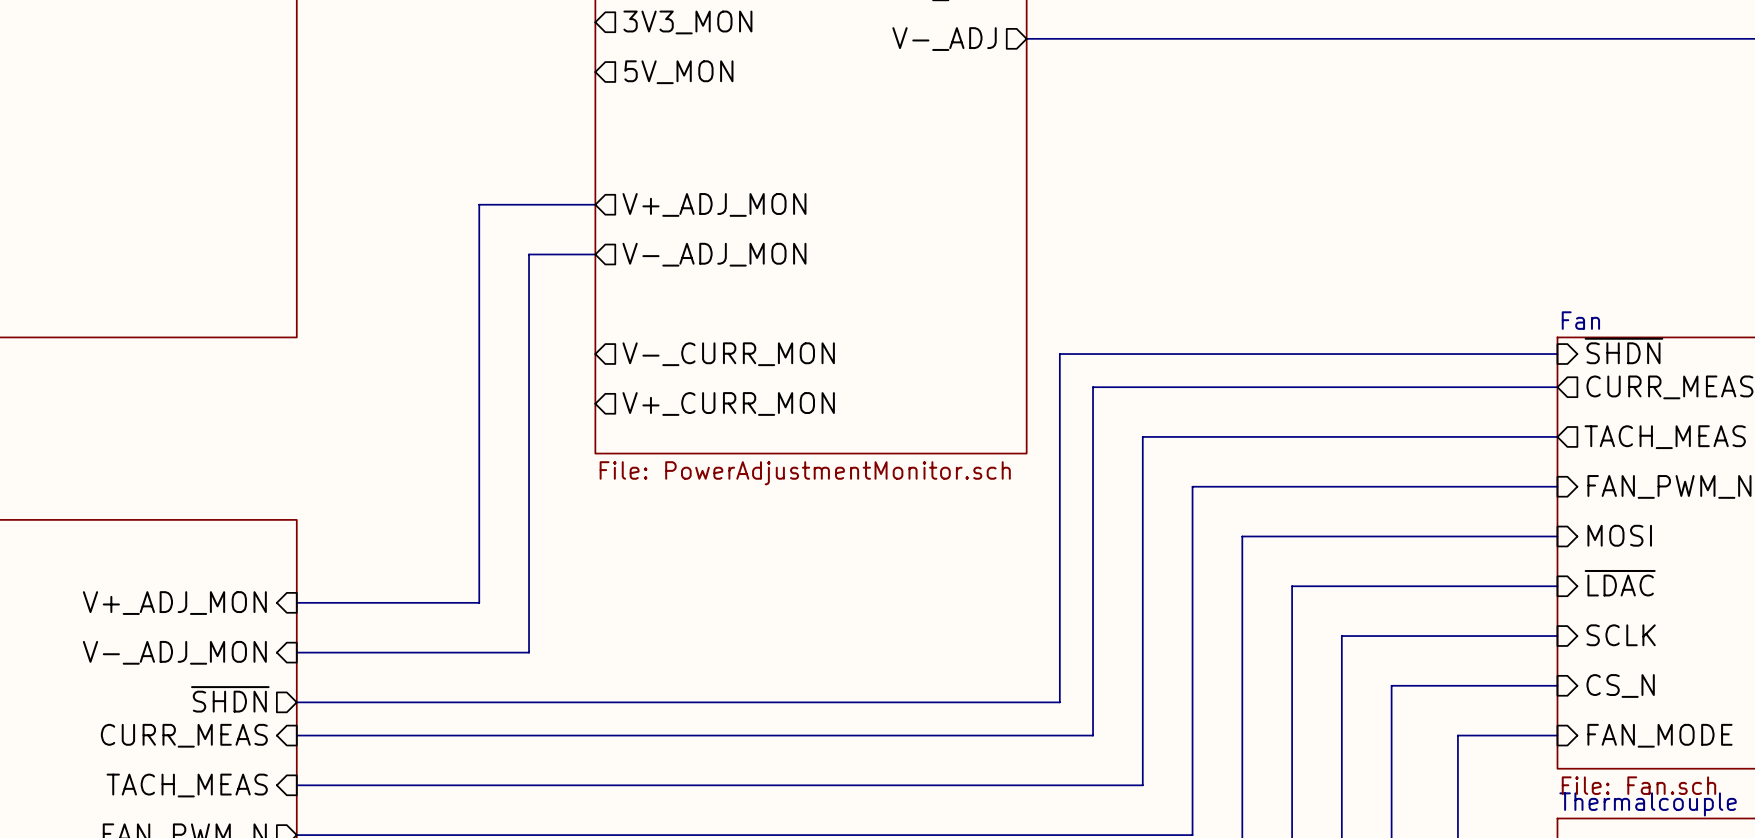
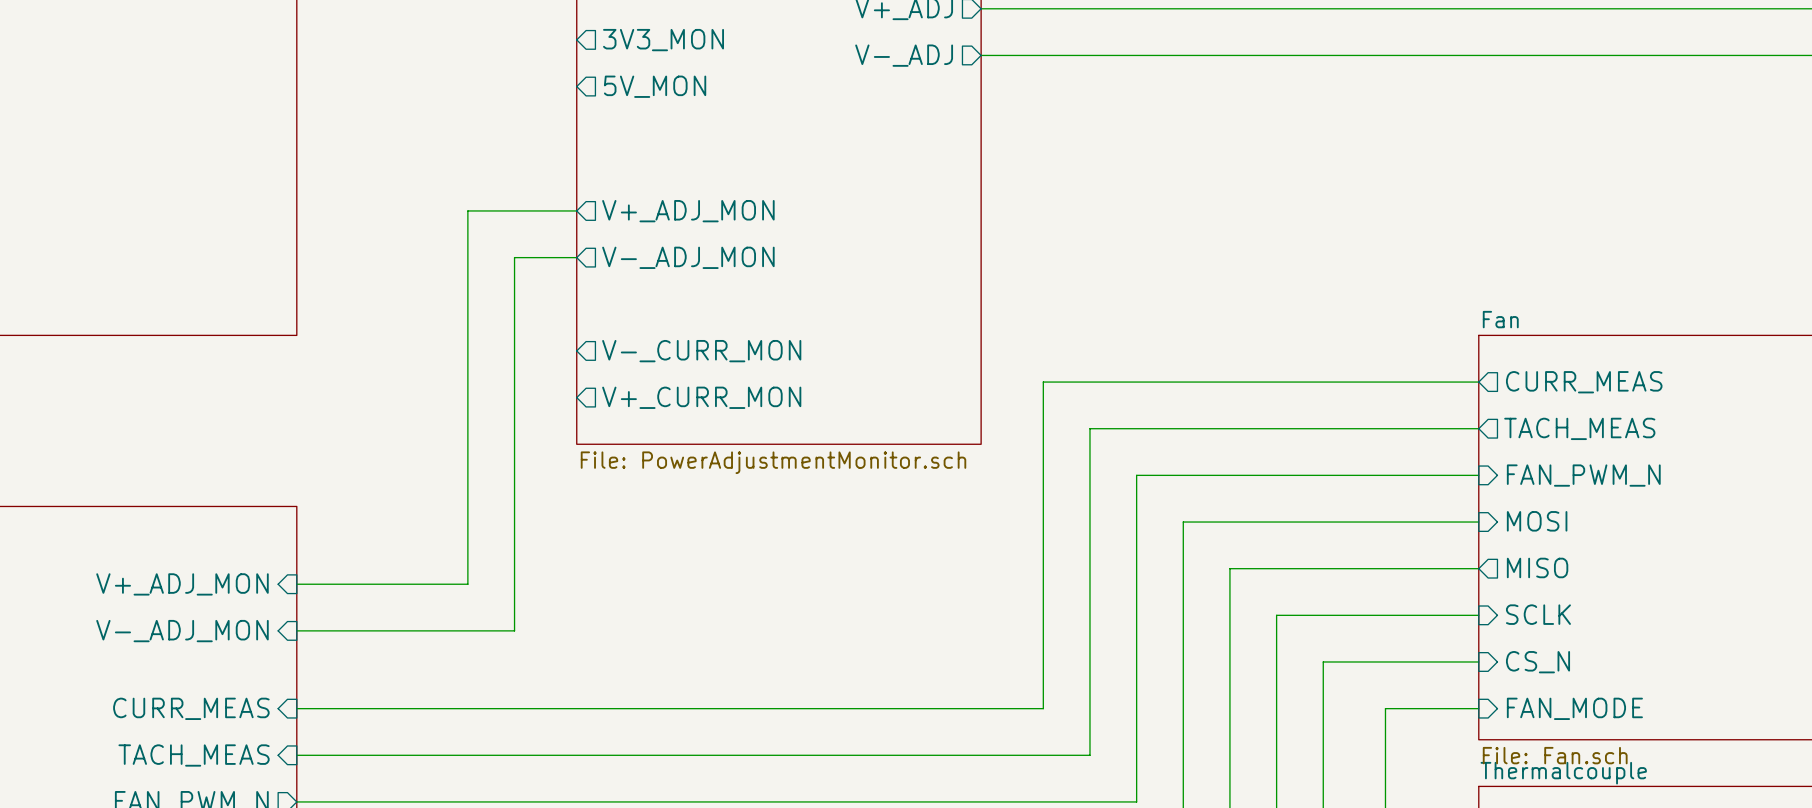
sheet pin: ~{SHDN} (1623, 350) -> none
wire: (1557, 354) (1059, 354) (1059, 702) (296, 702) -> none
sheet pin shape: input (1620, 583) -> output (1537, 567)
sheet pin: ~{LDAC} (1620, 583) -> MISO (1537, 567)
sheet pin: ~{SHDN} (230, 699) -> none

